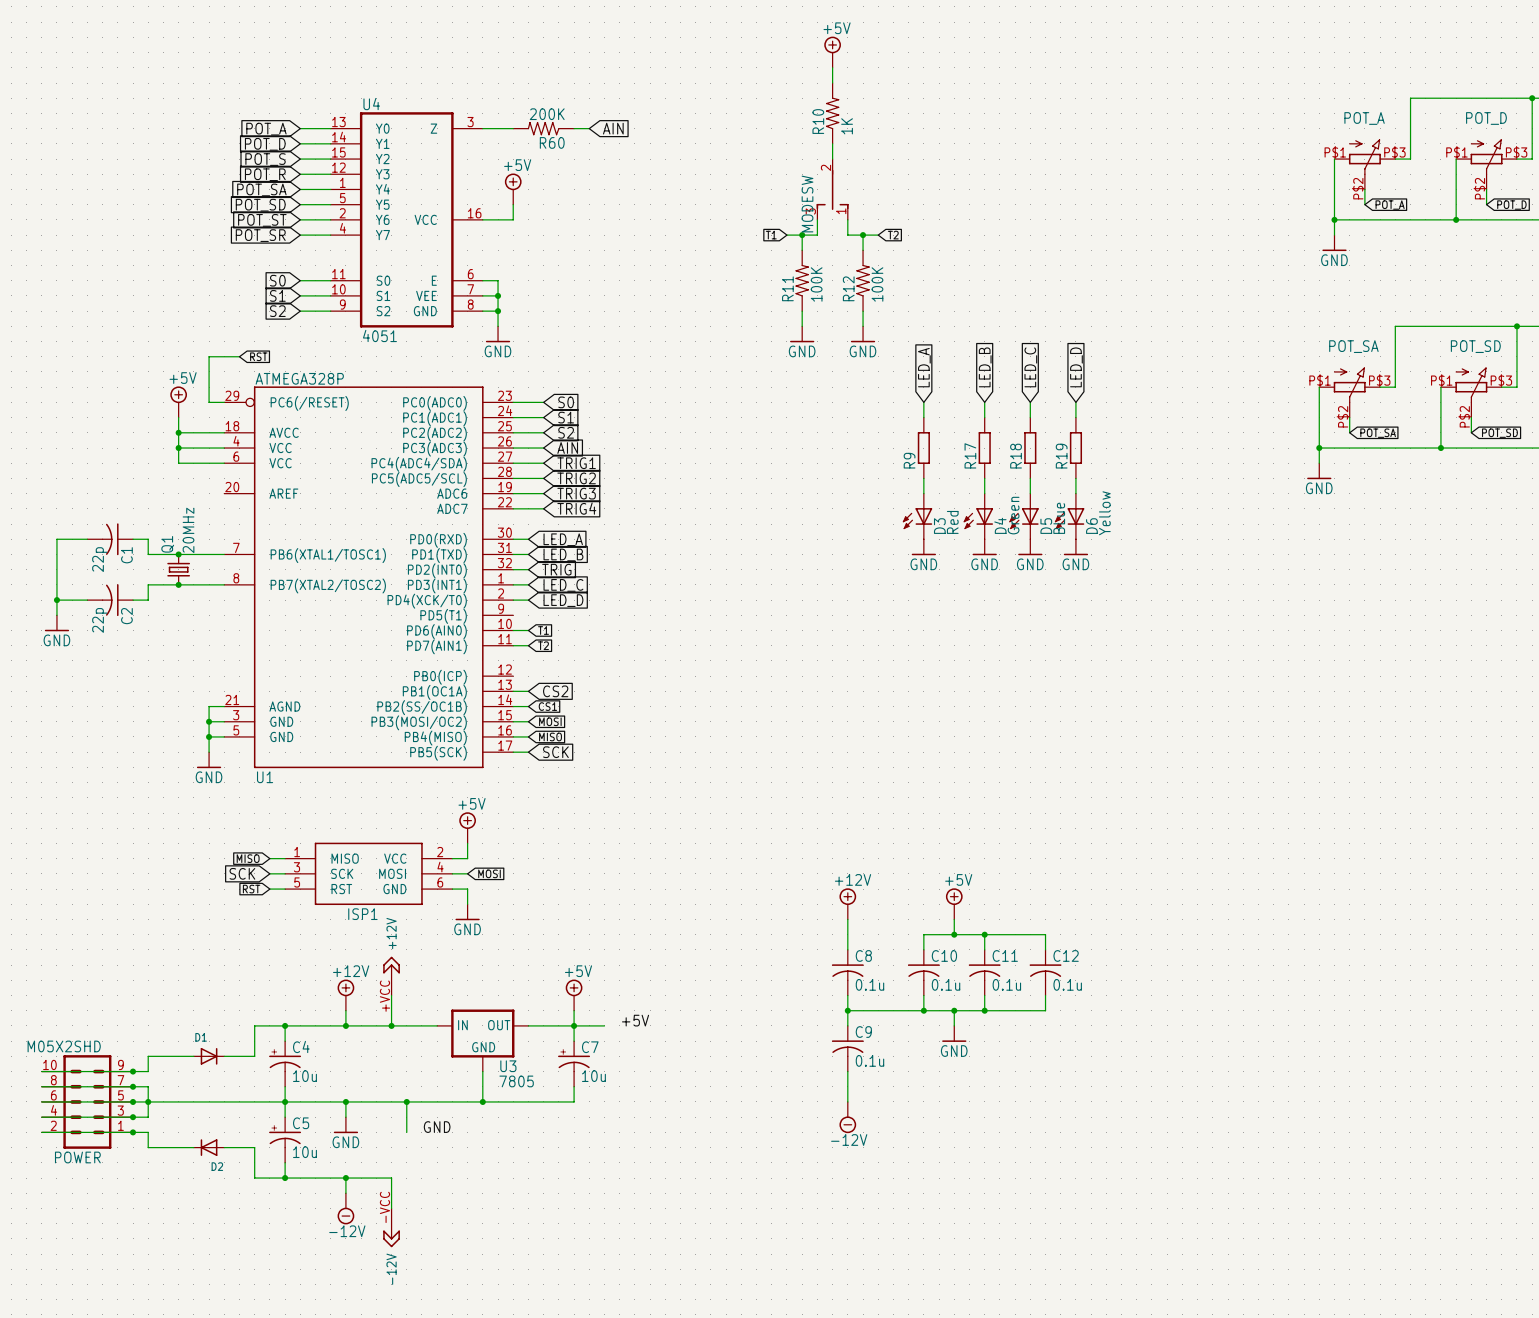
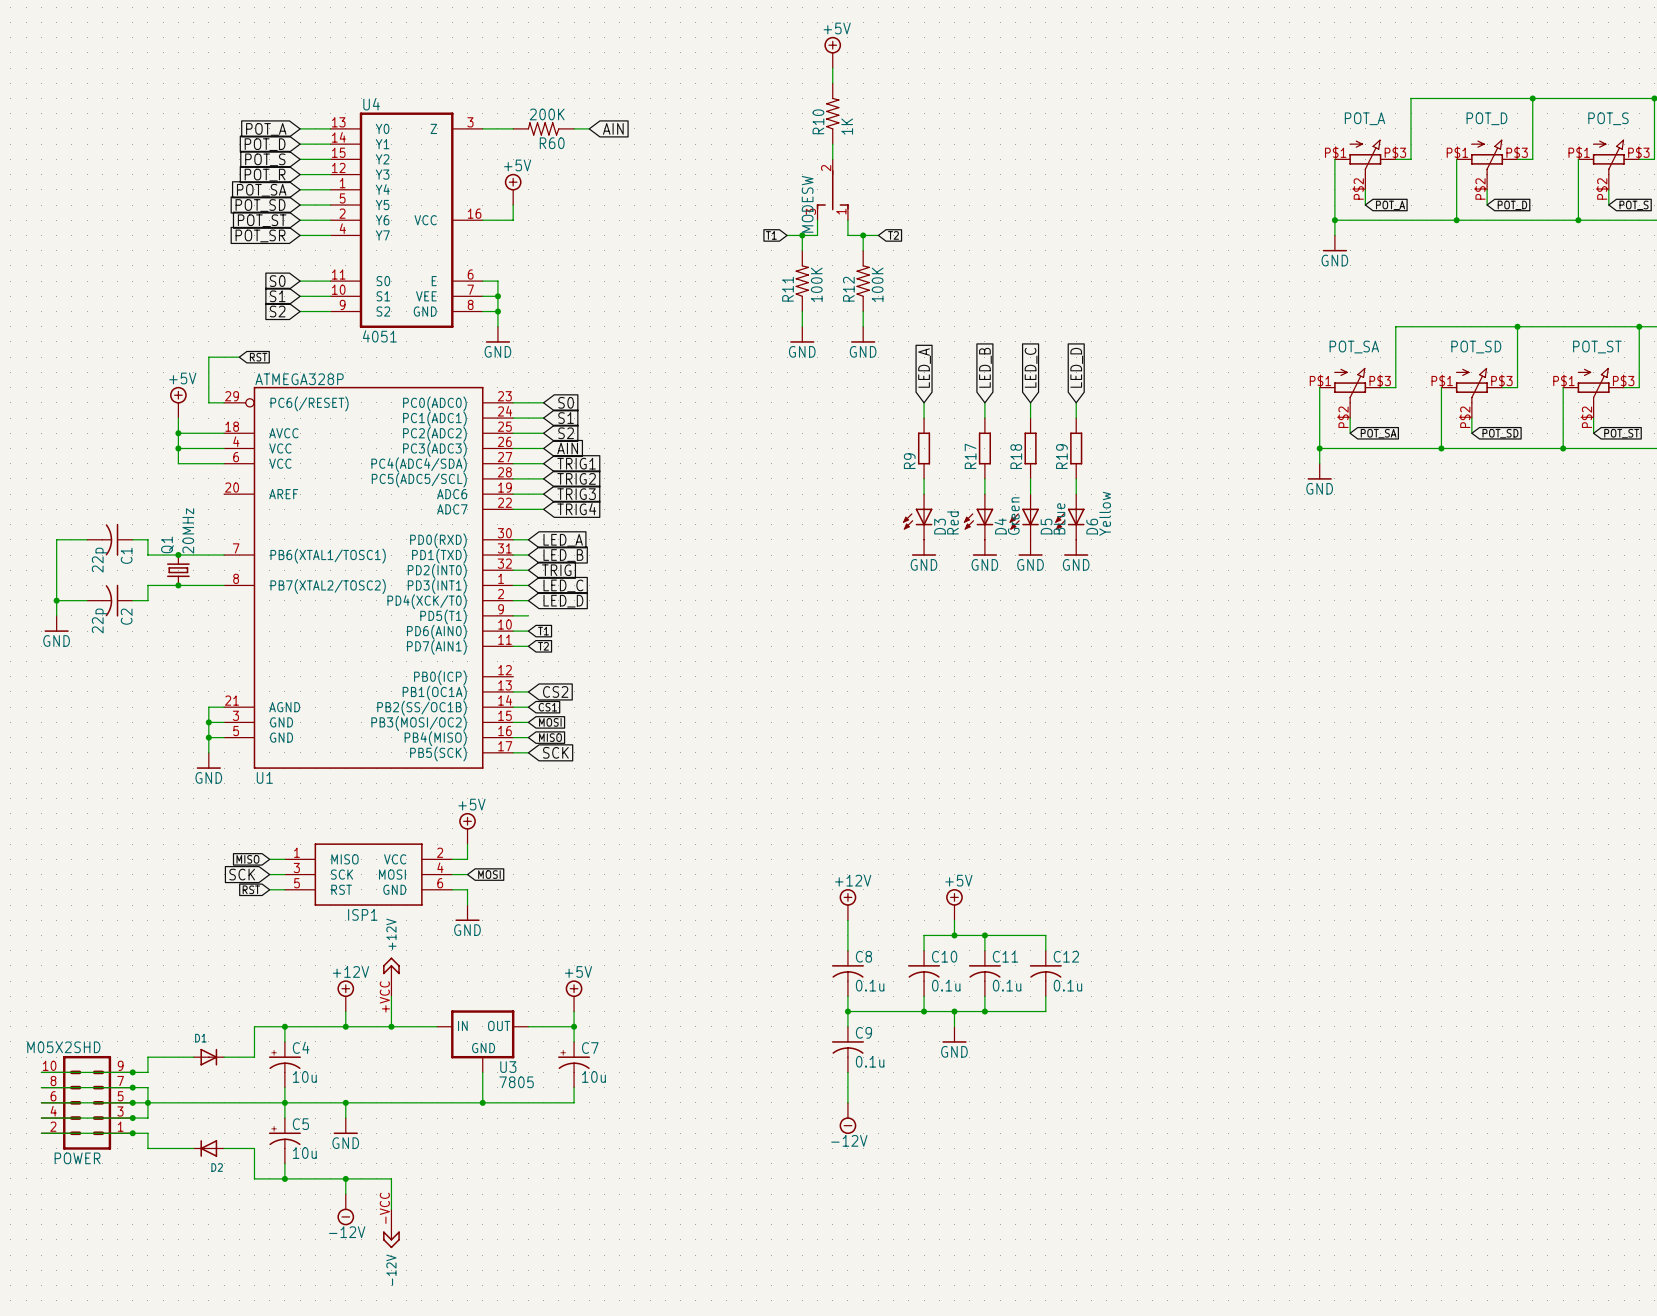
wire: none -> (513, 615) (528, 615)
label: +5V (635, 1020) -> none
wire: (574, 1025) (604, 1025) -> none
wire: (406, 1101) (406, 1132) -> none
junction: (406, 1101) -> none
label: GND (437, 1127) -> none

